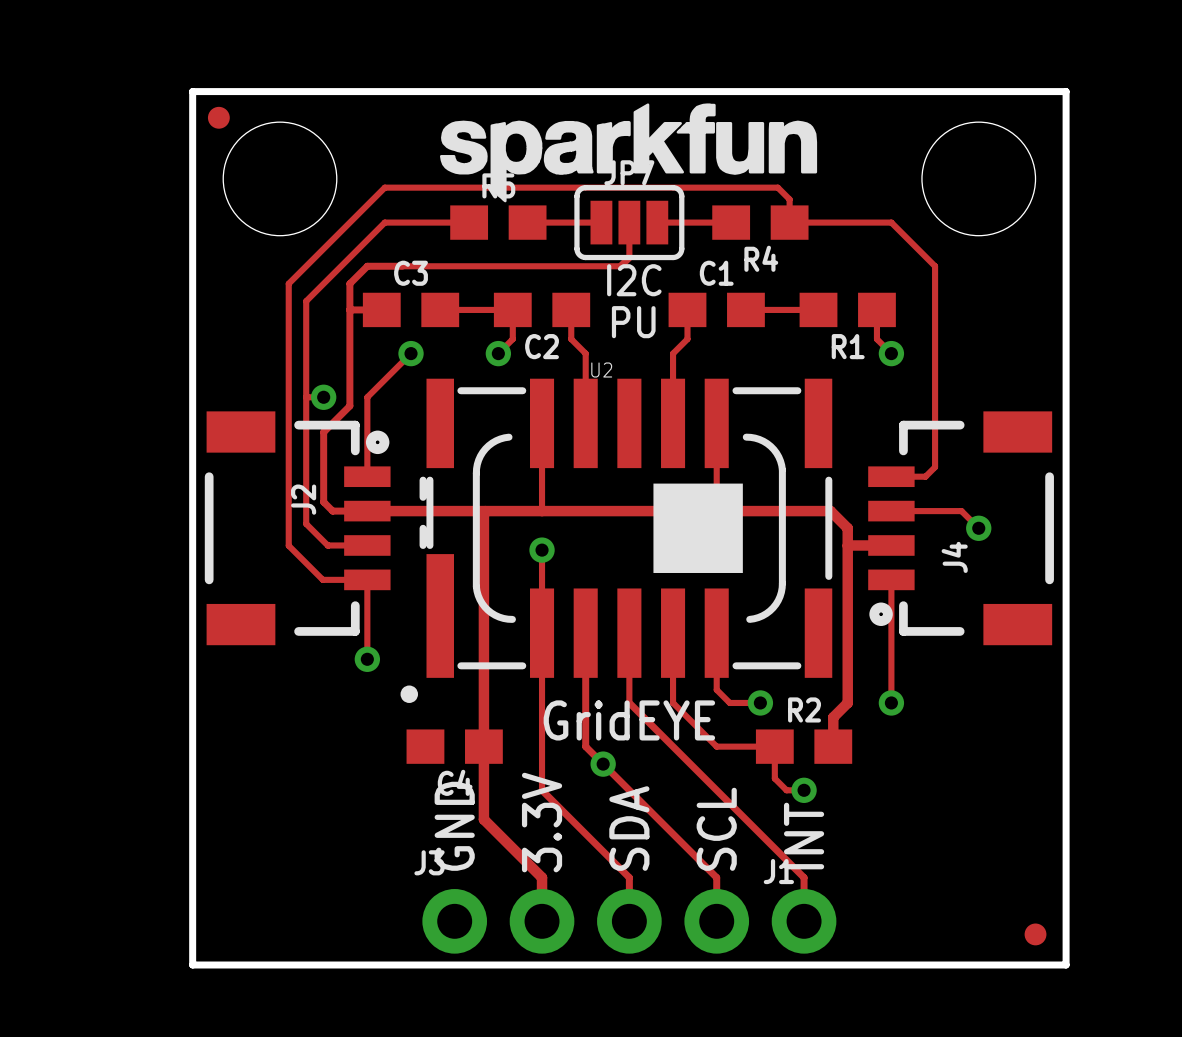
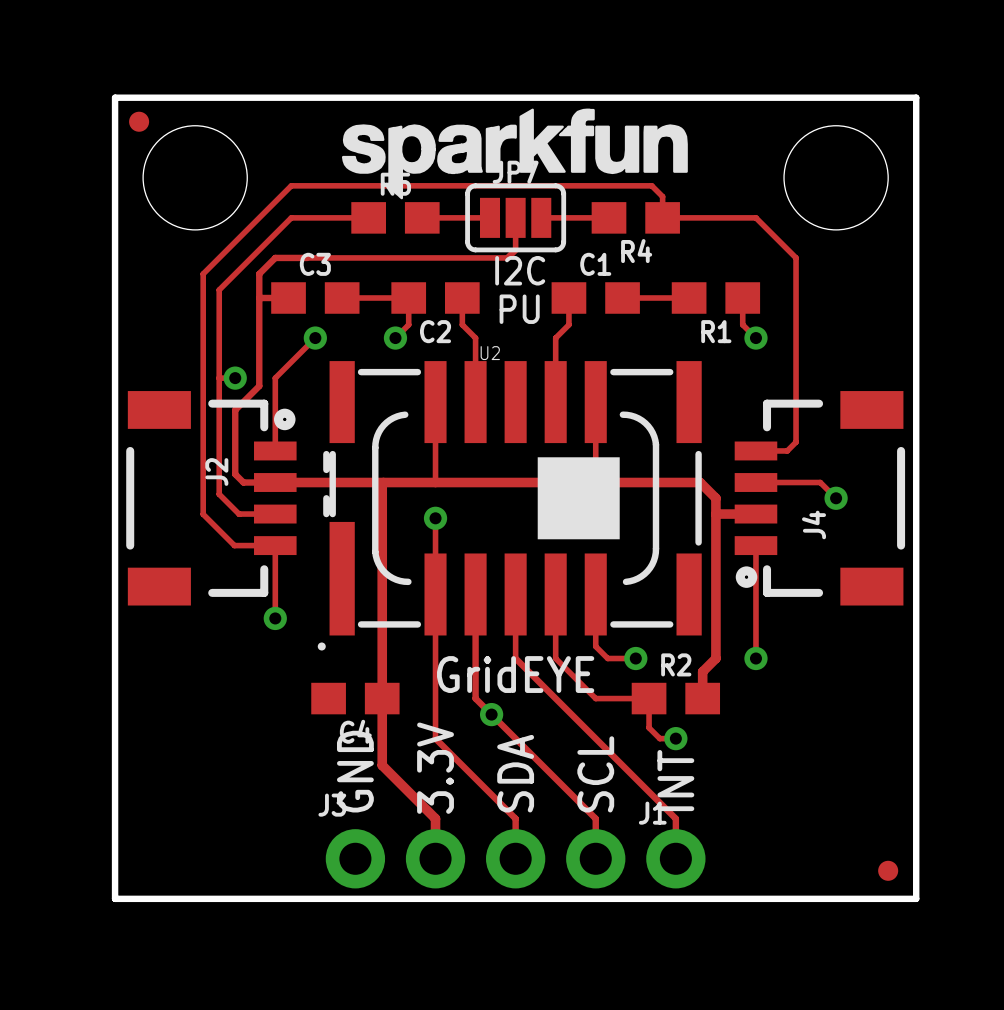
U2 footprint: [400, 378, 833, 703] -> [317, 361, 702, 651]

